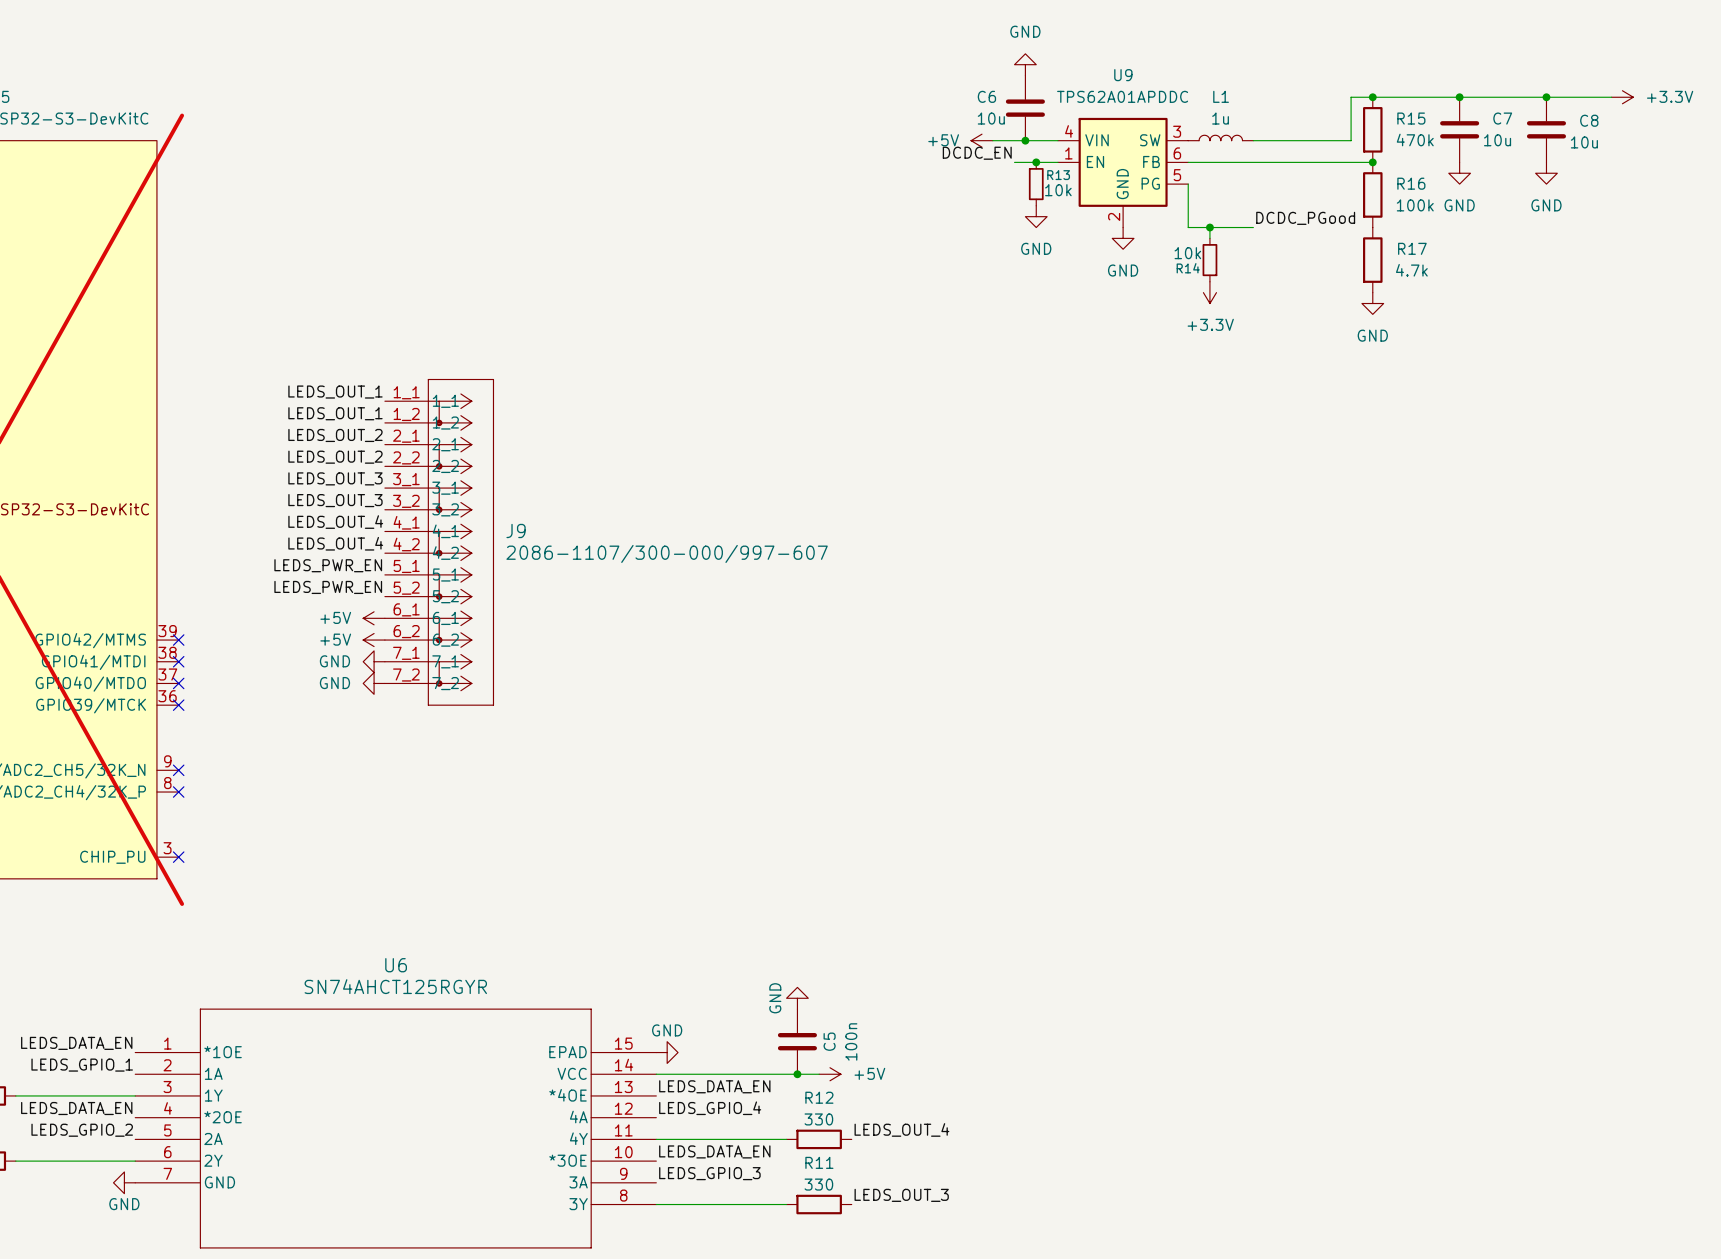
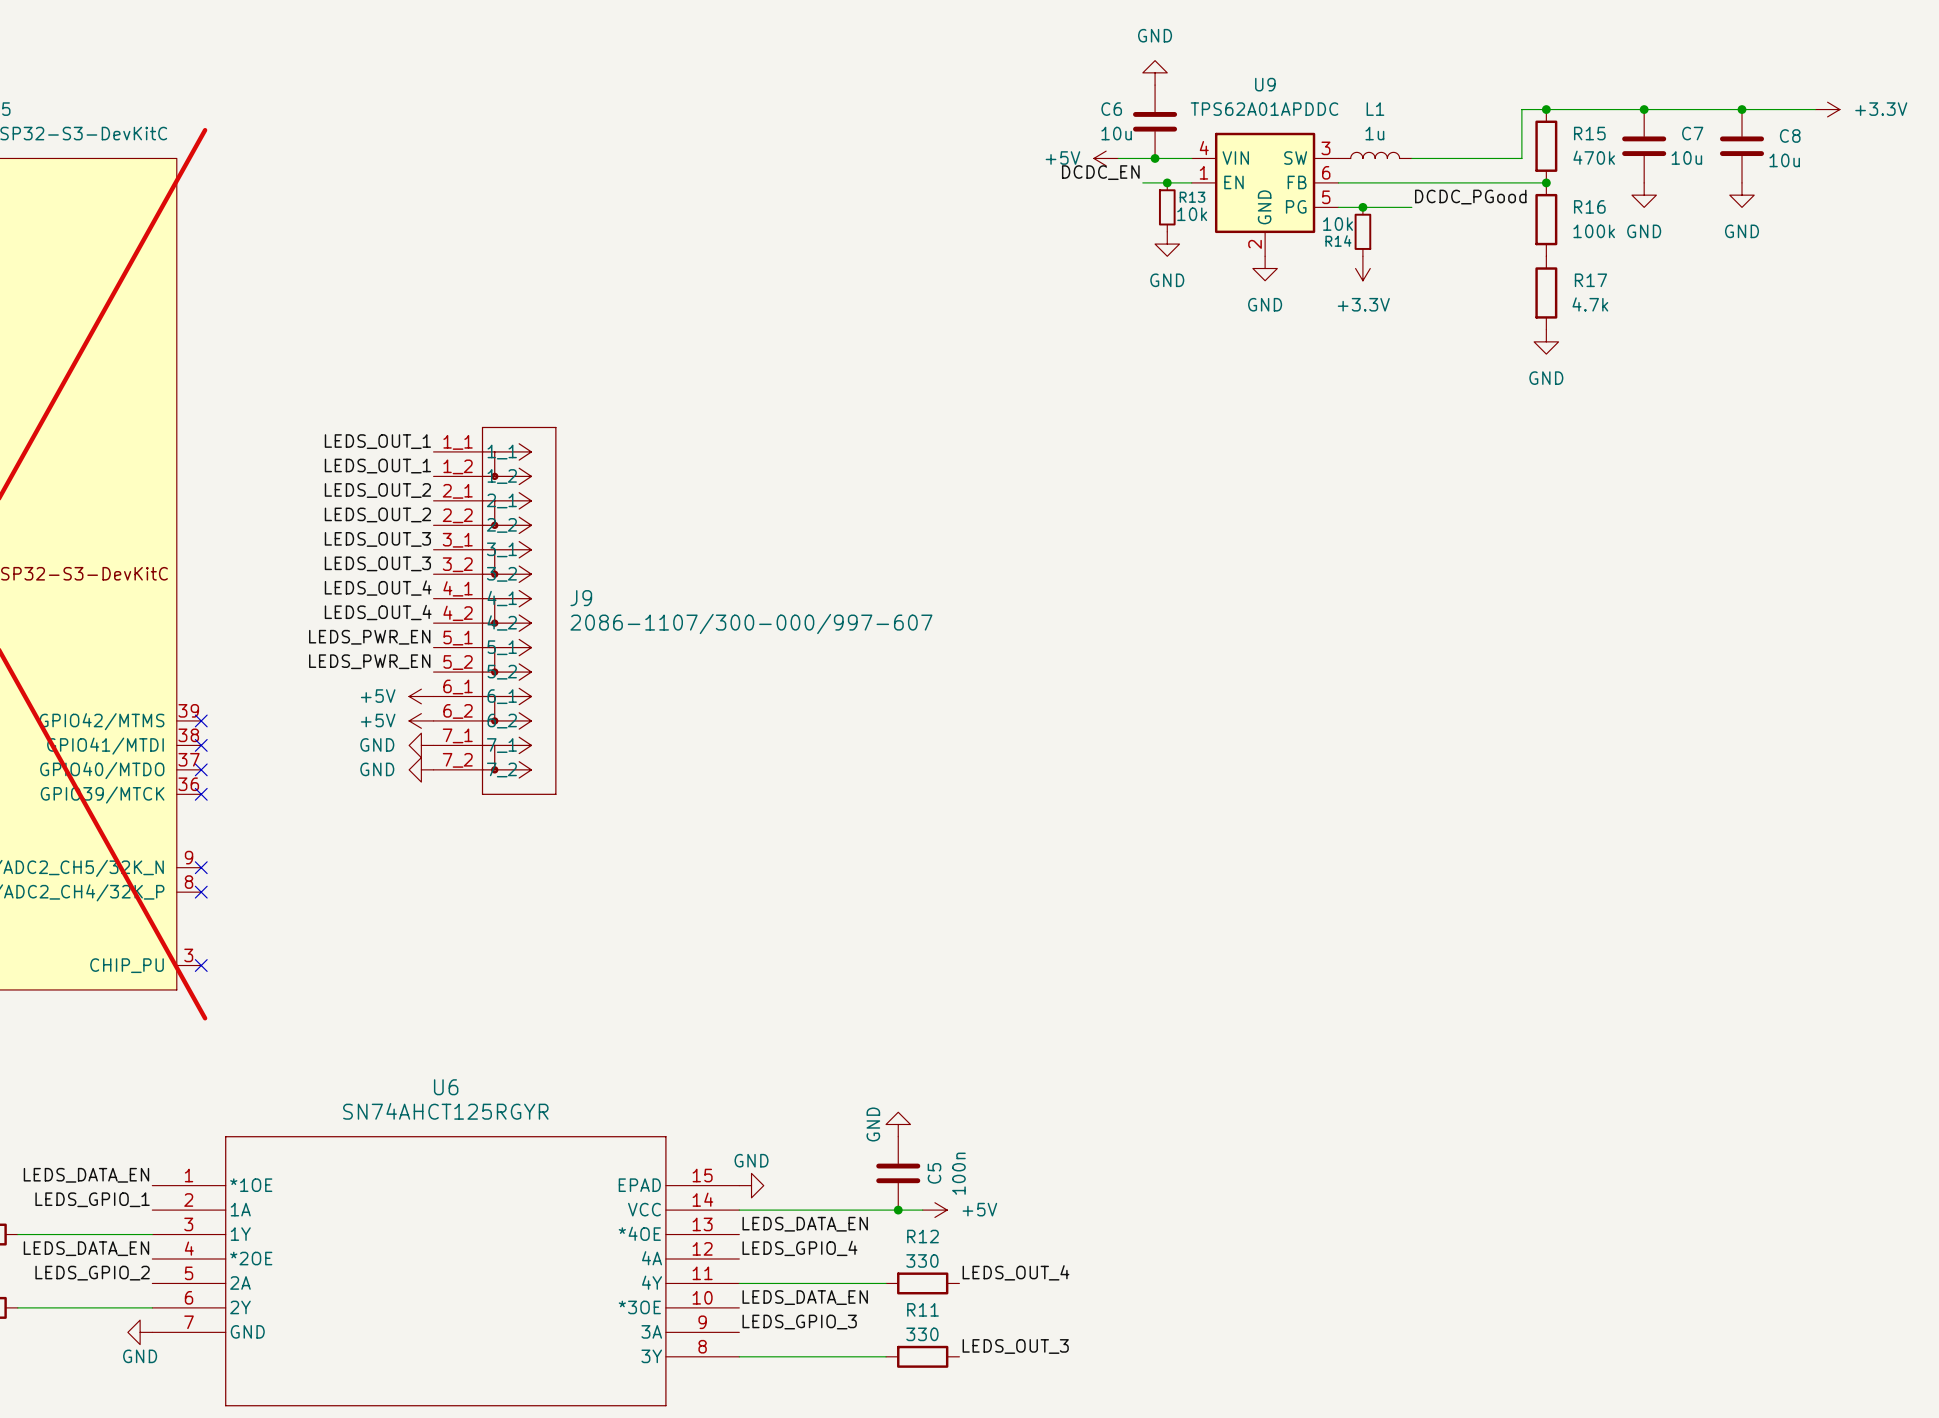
wire: (1188, 184) (1188, 227) (1253, 227) -> (1338, 207) (1411, 207)
label position: DCDC_PGood (1305, 218) -> DCDC_PGood (1470, 197)
junction position: (1209, 227) -> (1362, 207)
R14 position: (1209, 260) -> (1362, 231)
power symbol position: +3.3V (1209, 292) -> +3.3V (1362, 268)

